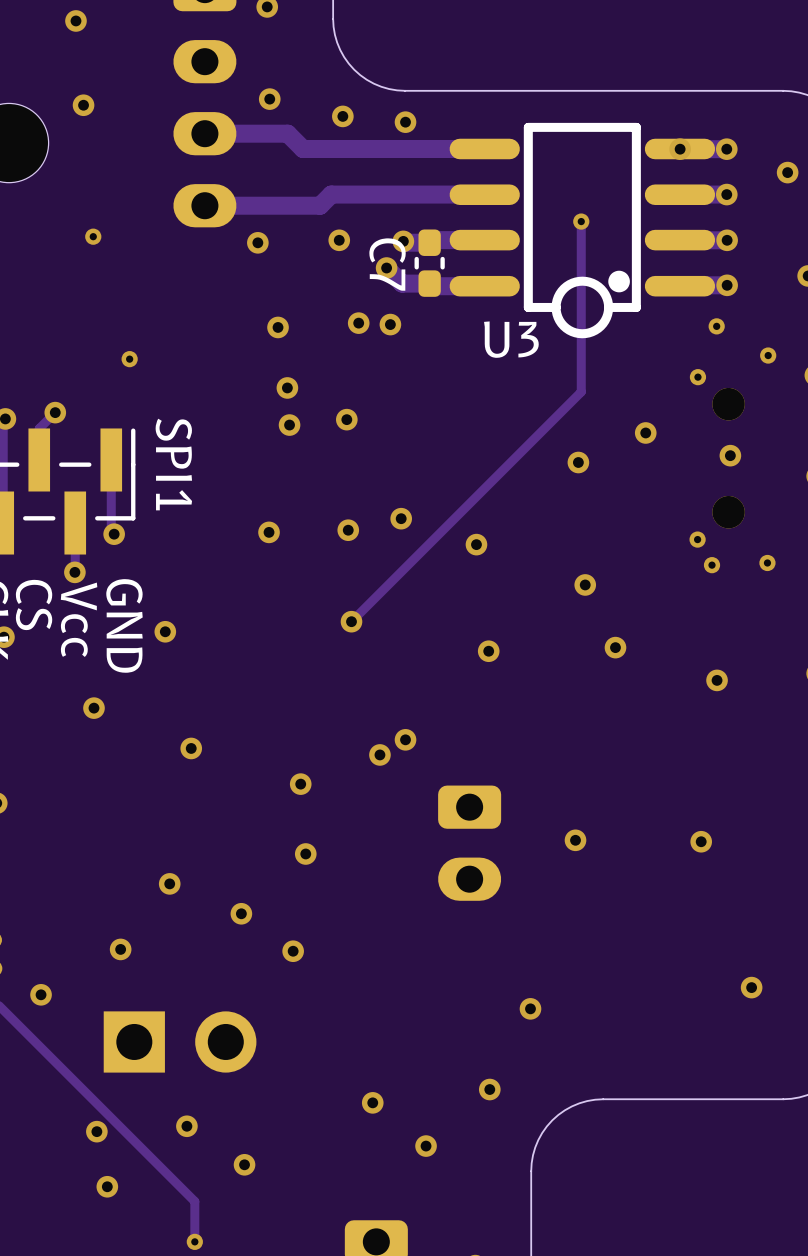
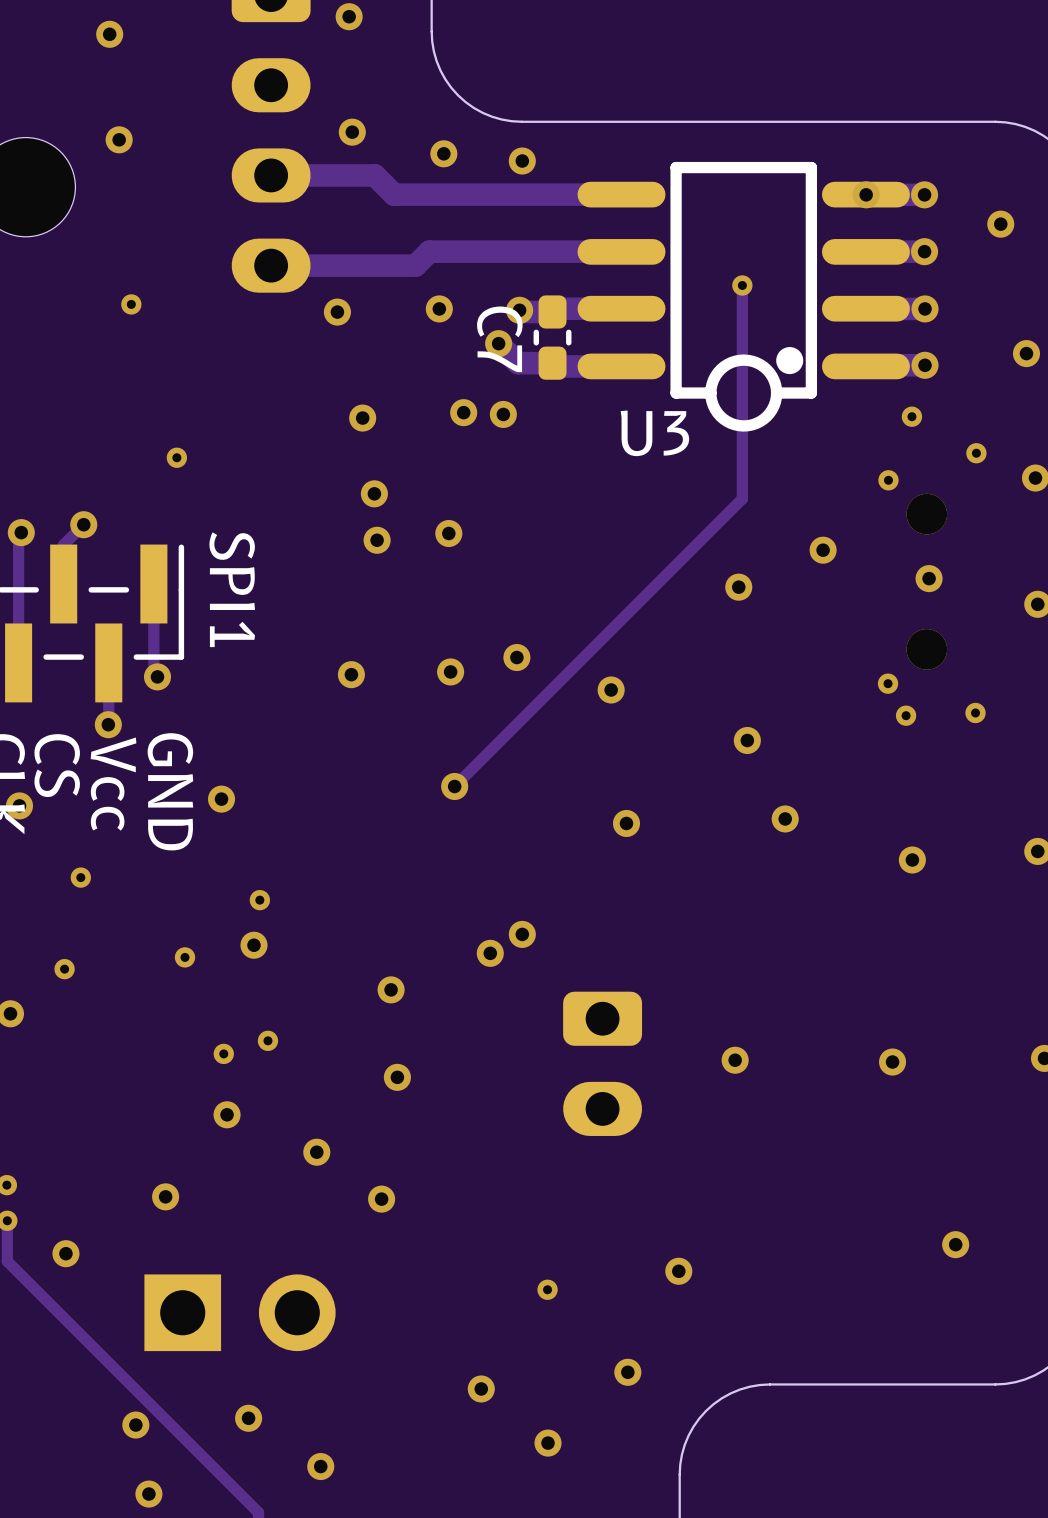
via: none -> (80, 877)
via: (93, 708) -> none
via: none -> (259, 900)
via: none -> (185, 957)
via: none -> (64, 969)
via: none -> (267, 1040)
via: none -> (223, 1053)
via: none -> (547, 1289)

